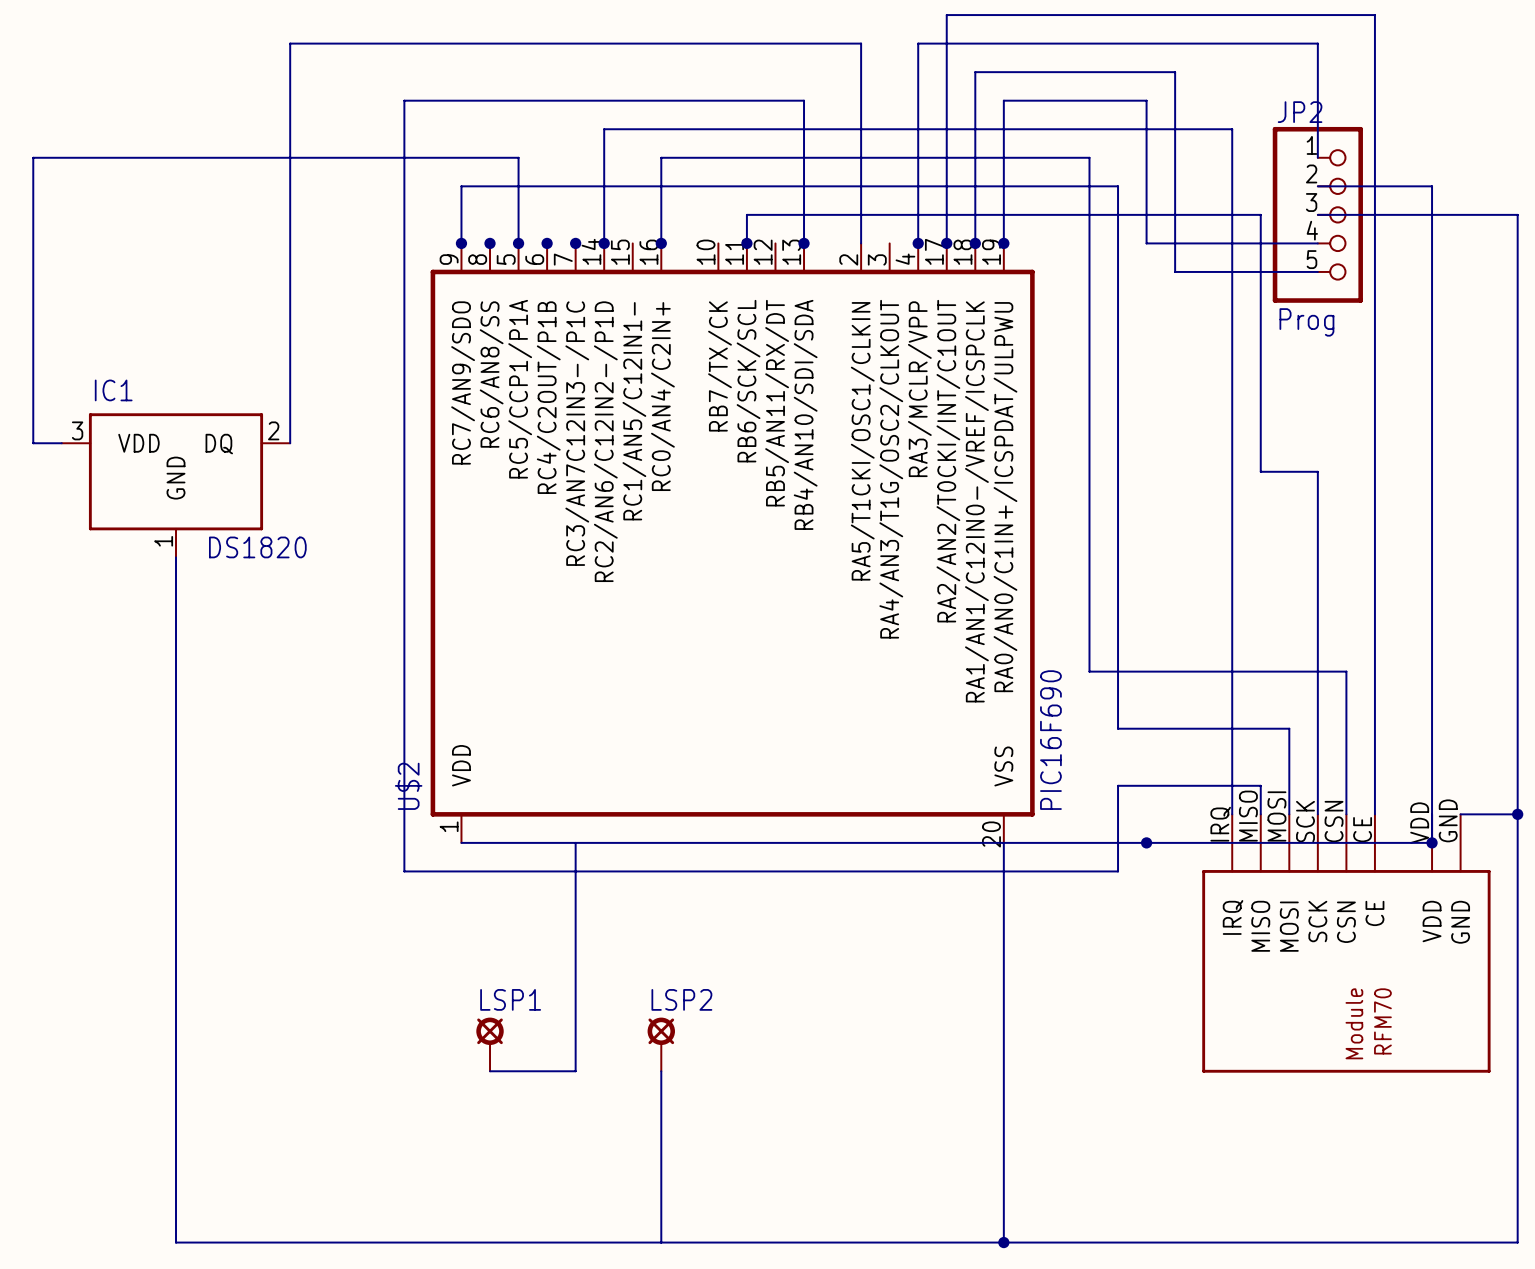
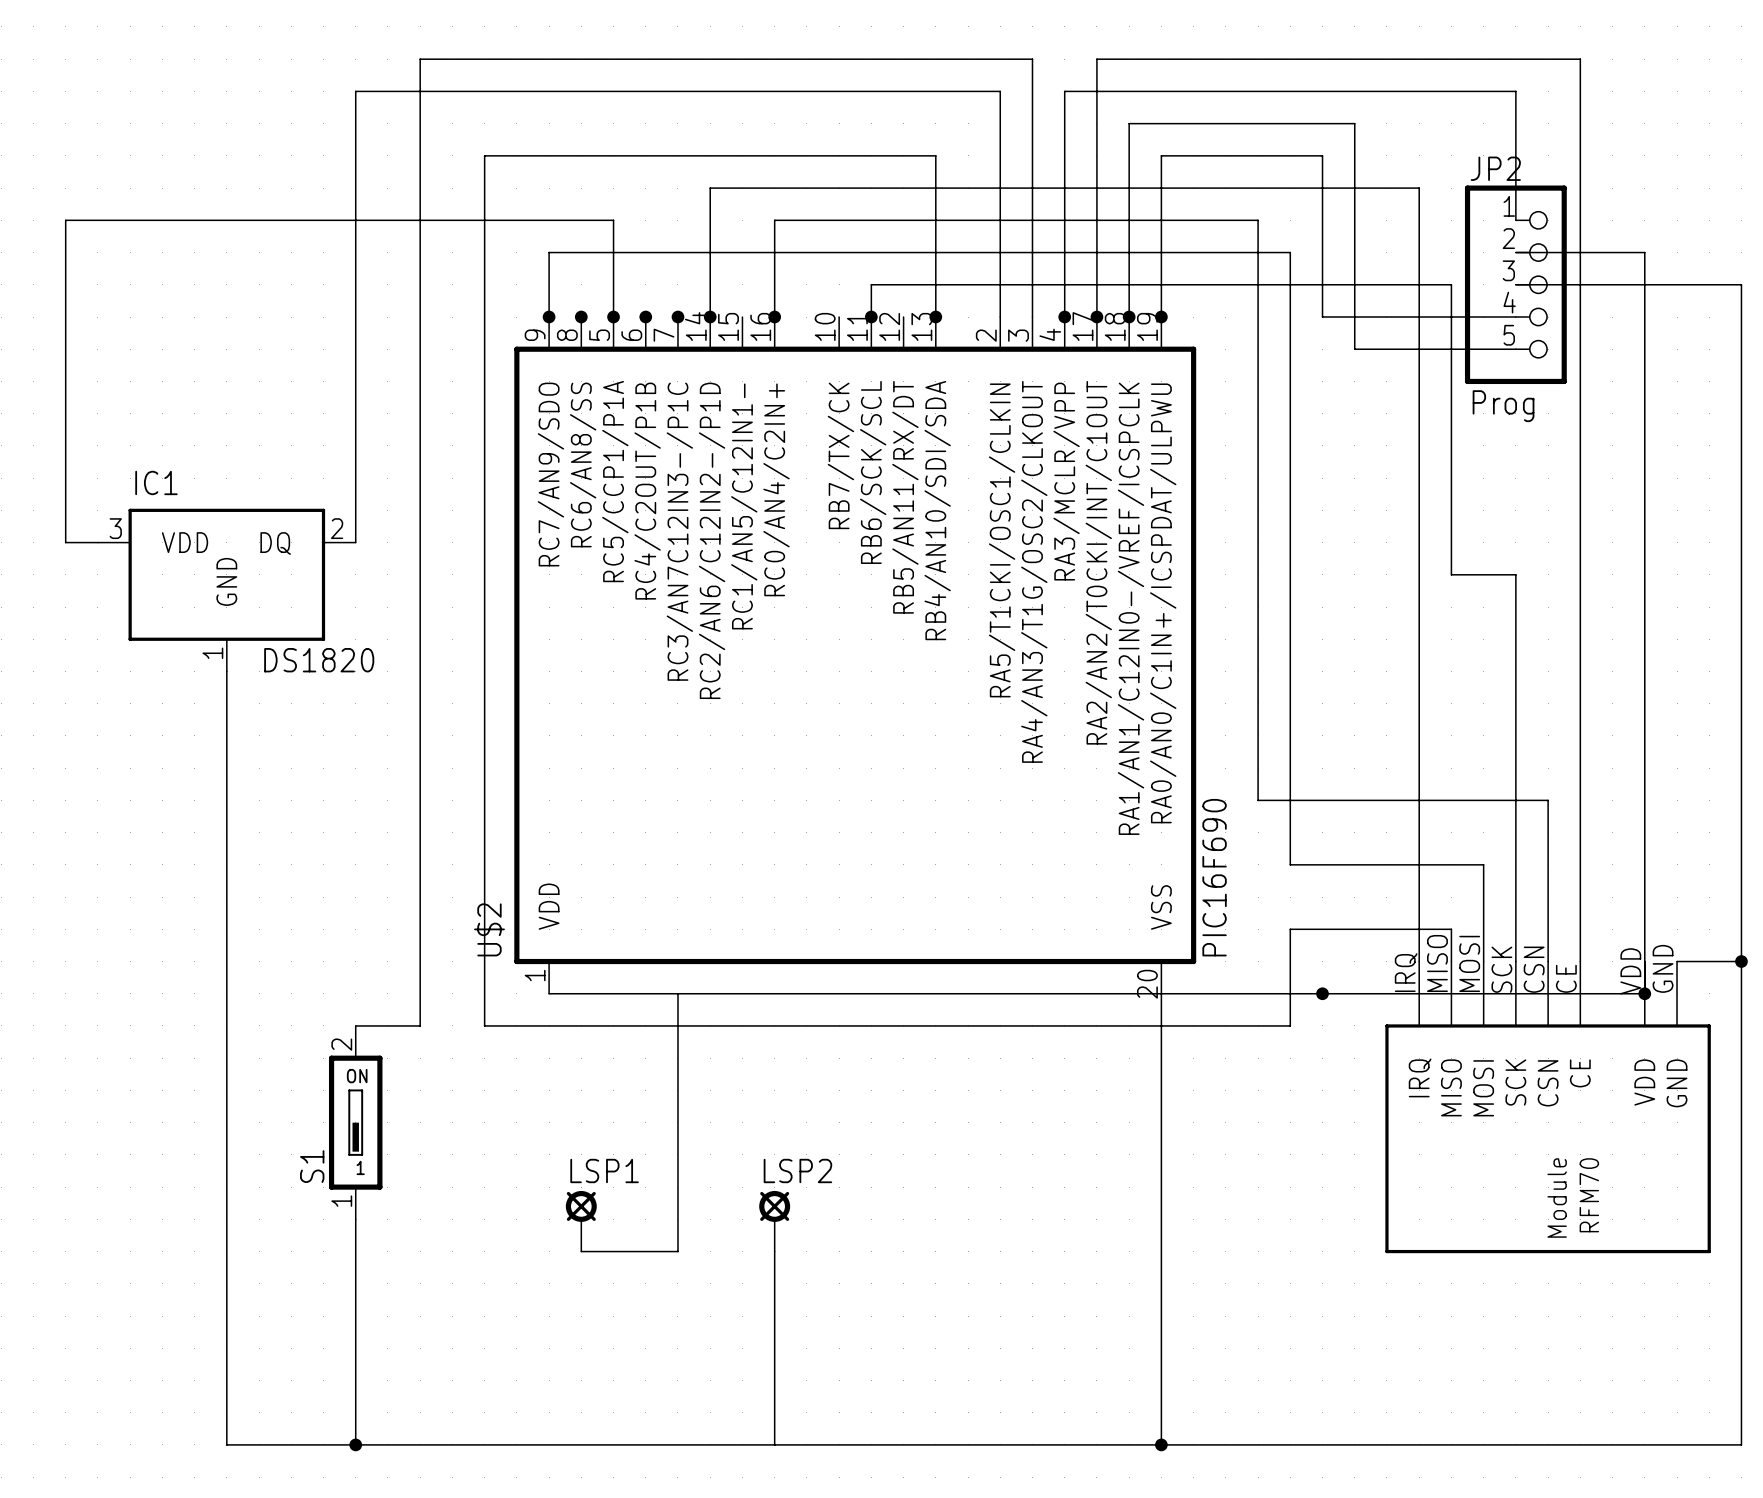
wire: none -> (1032, 317) (1032, 59) (420, 59) (420, 1025) (355, 1025)
S1: none -> (355, 1122)
wire: none -> (355, 1219) (355, 1444)
junction: none -> (355, 1444)

